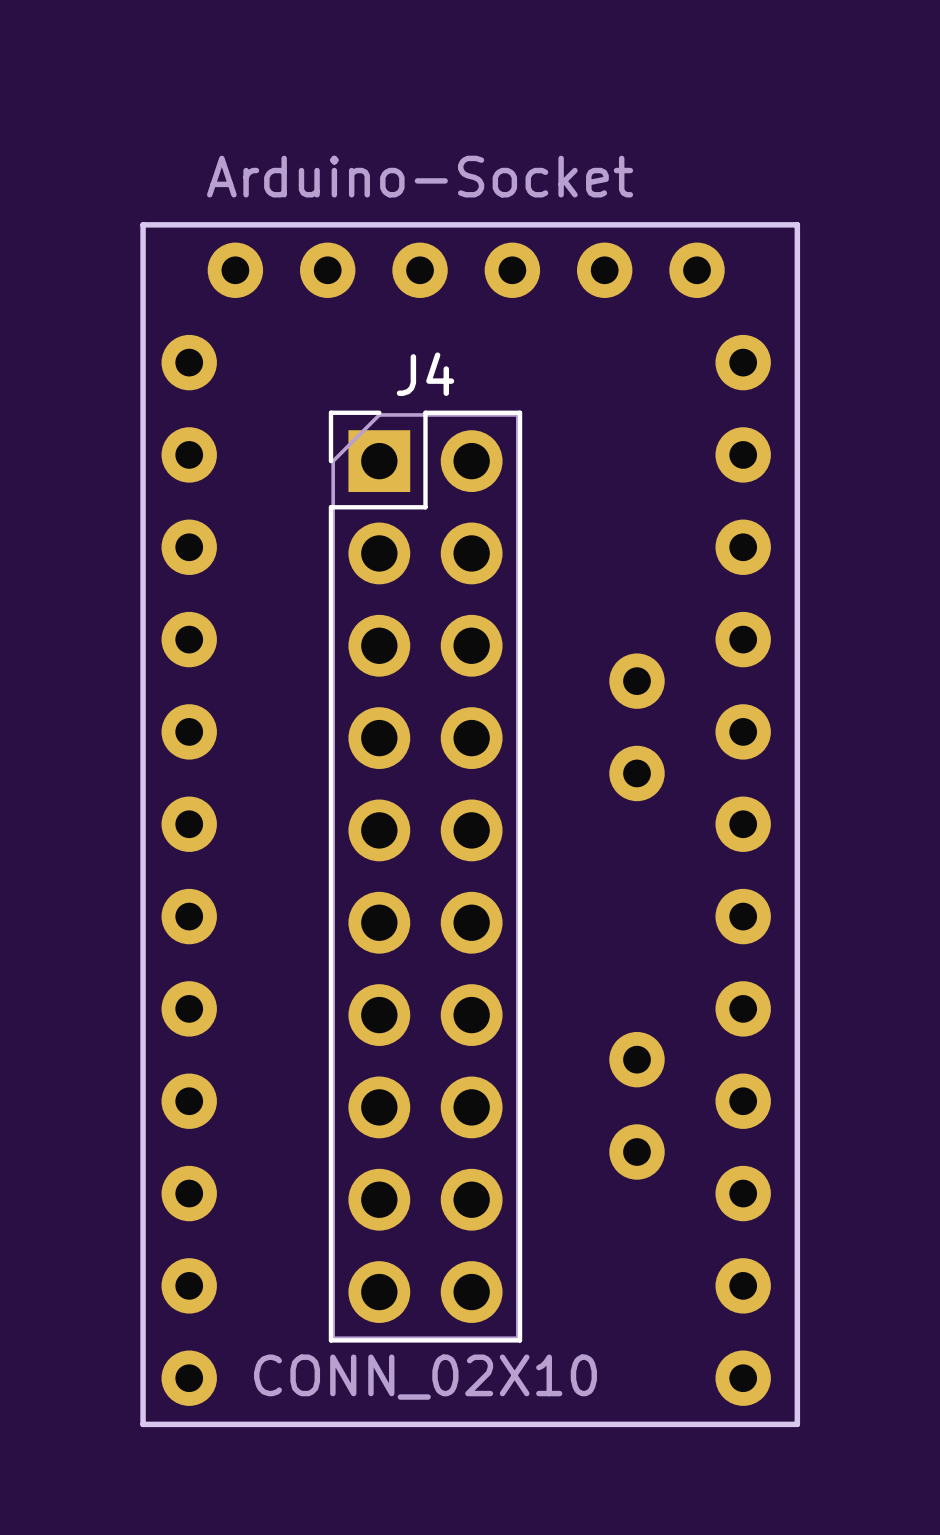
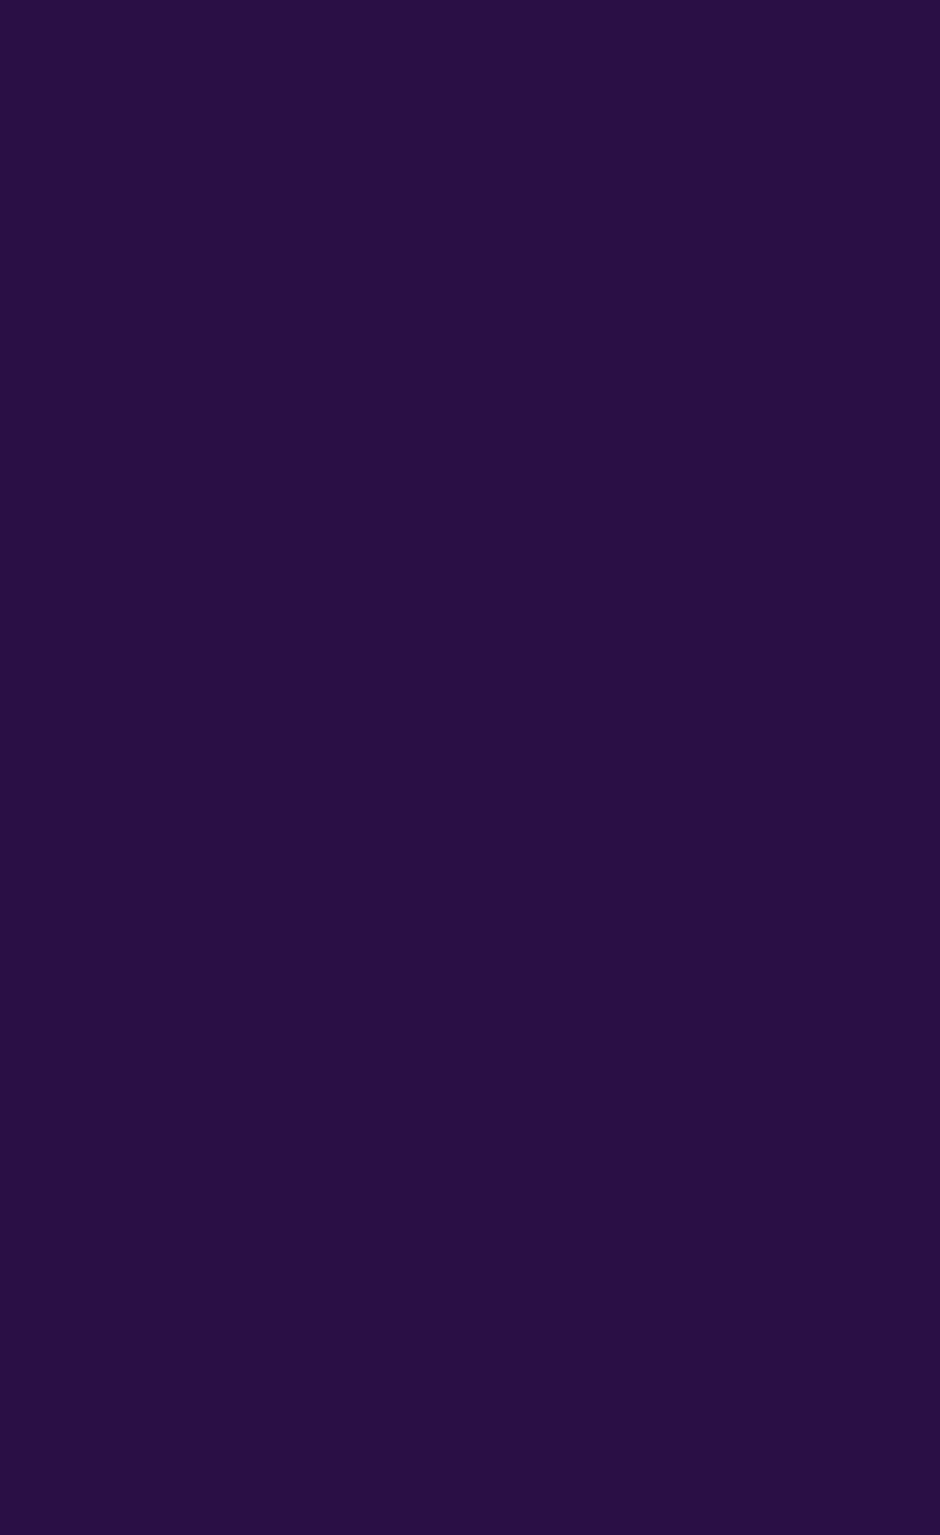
board edge: (143, 224) (797, 224) (797, 1424) (143, 1424) (143, 224) -> none
part: Arduino-Socket (466, 824) -> none
J4: CONN_02X10 (425, 876) -> none

